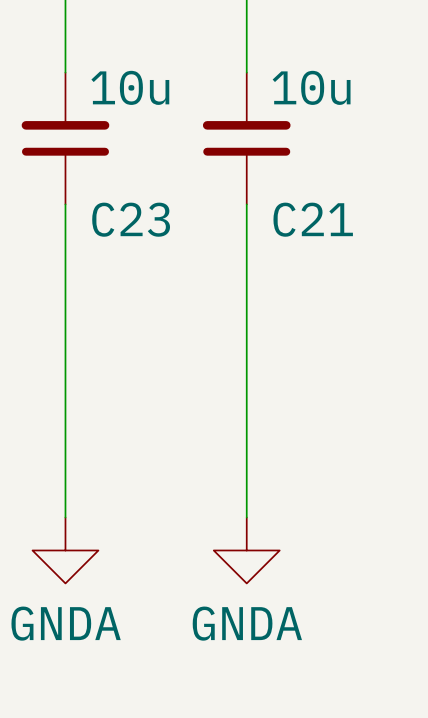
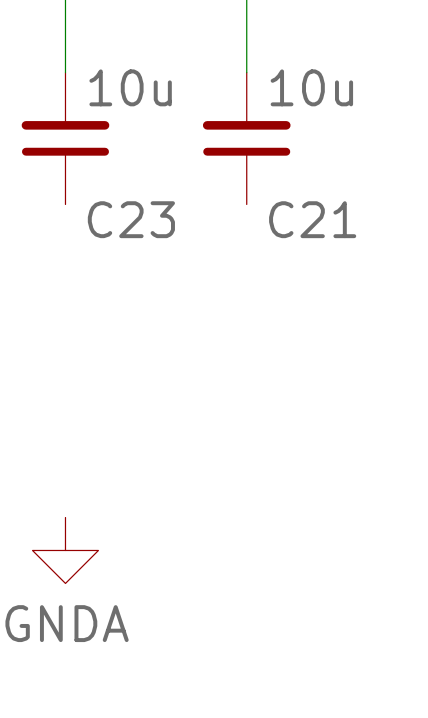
wire: (65, 204) (65, 517) -> none
wire: (246, 204) (246, 517) -> none
power symbol: GNDA (246, 550) -> none

